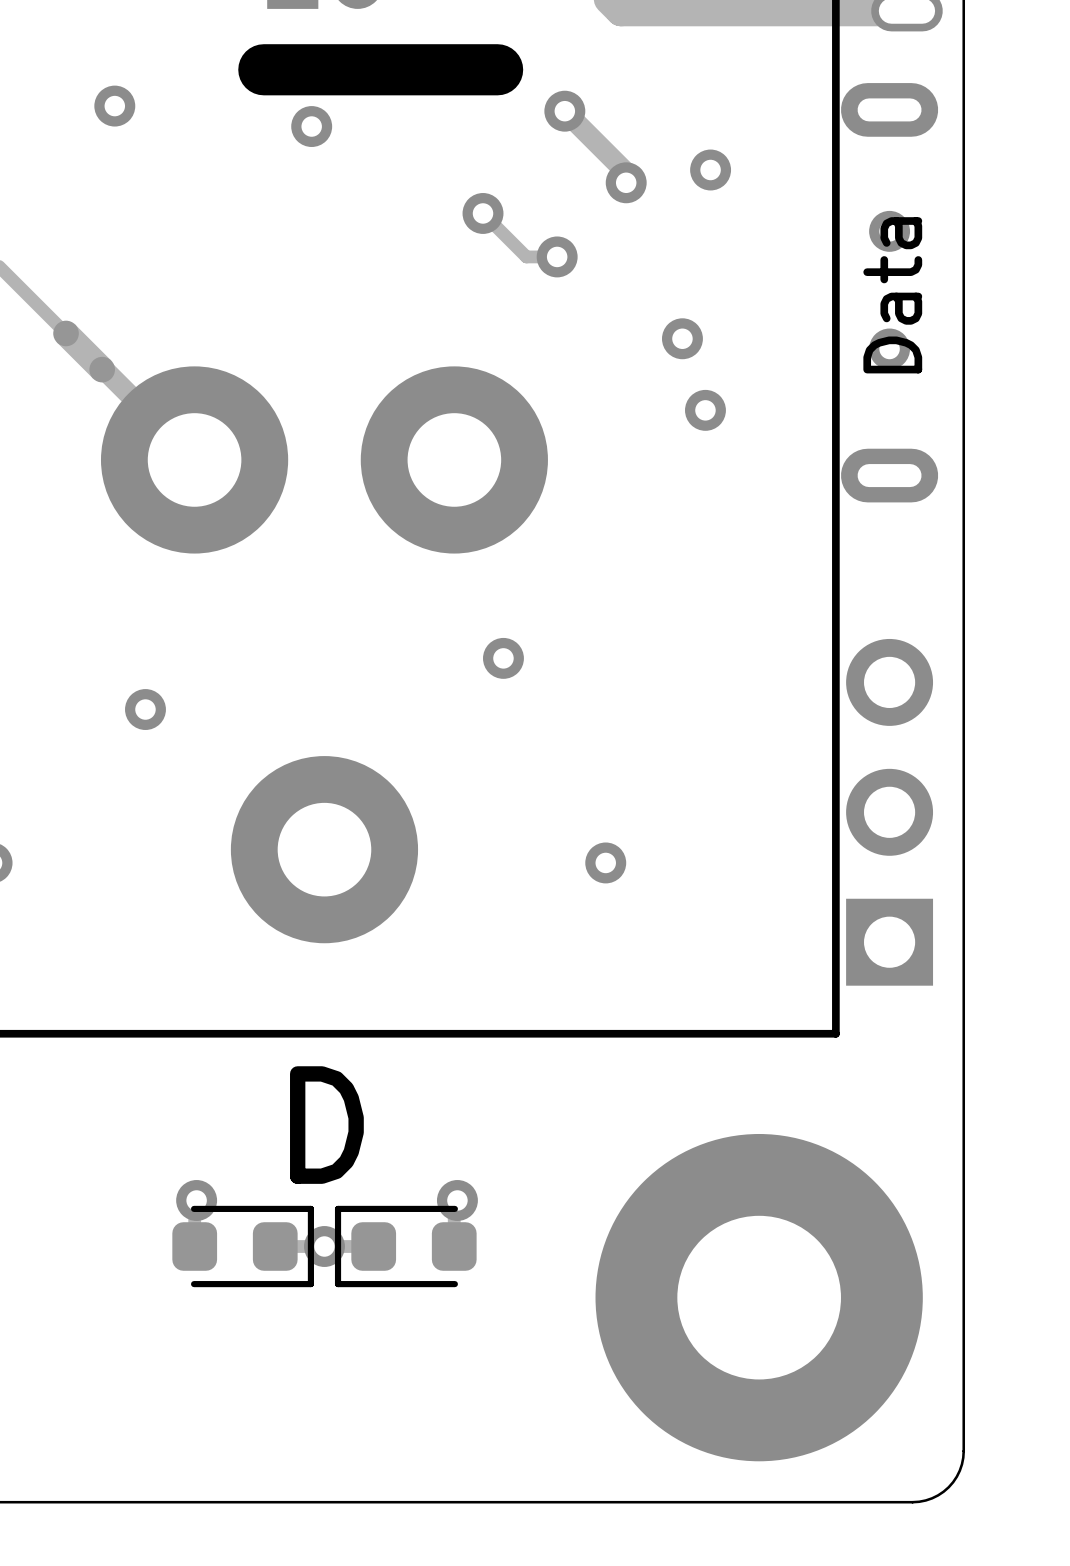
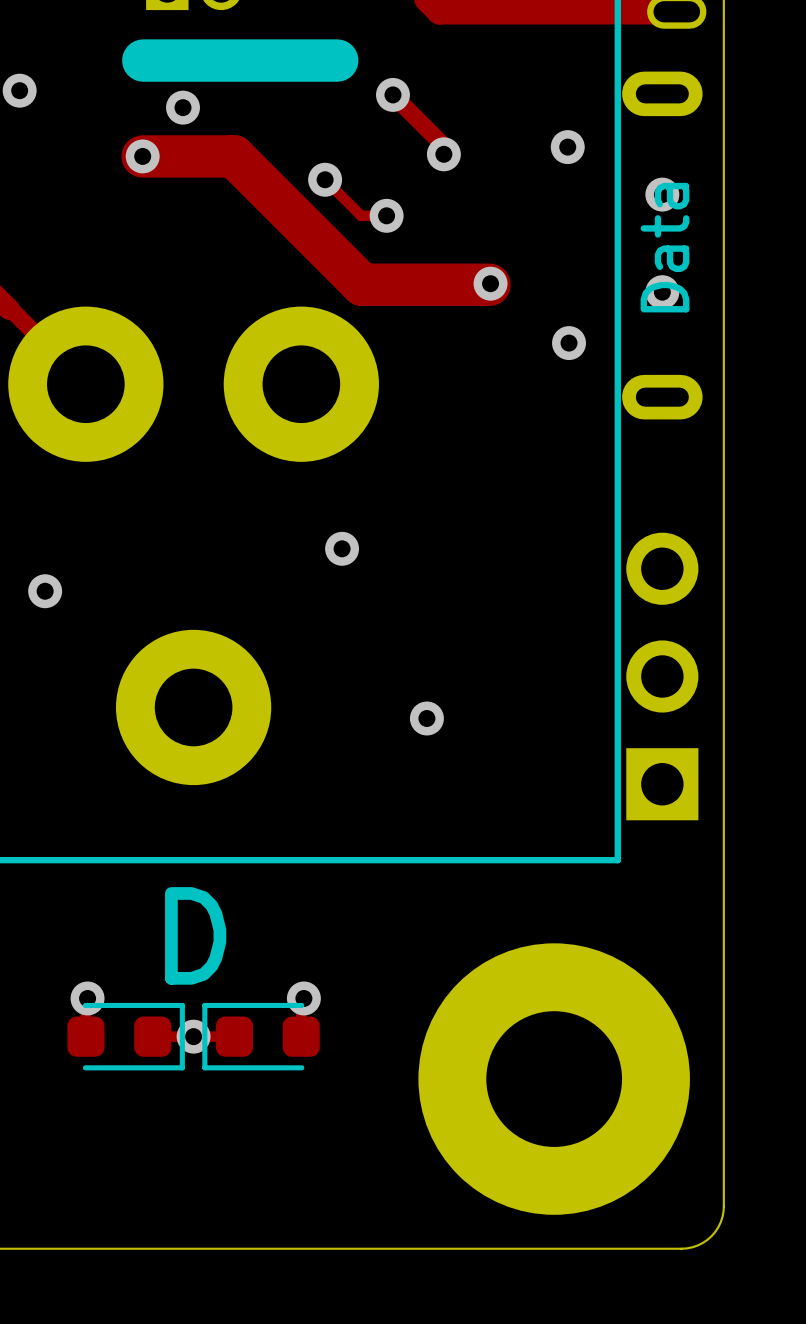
via position: (710, 170) -> (567, 147)
track: none -> (142, 156) (233, 156) (362, 284) (489, 284)
via: none -> (142, 156)
via position: (705, 410) -> (569, 343)

